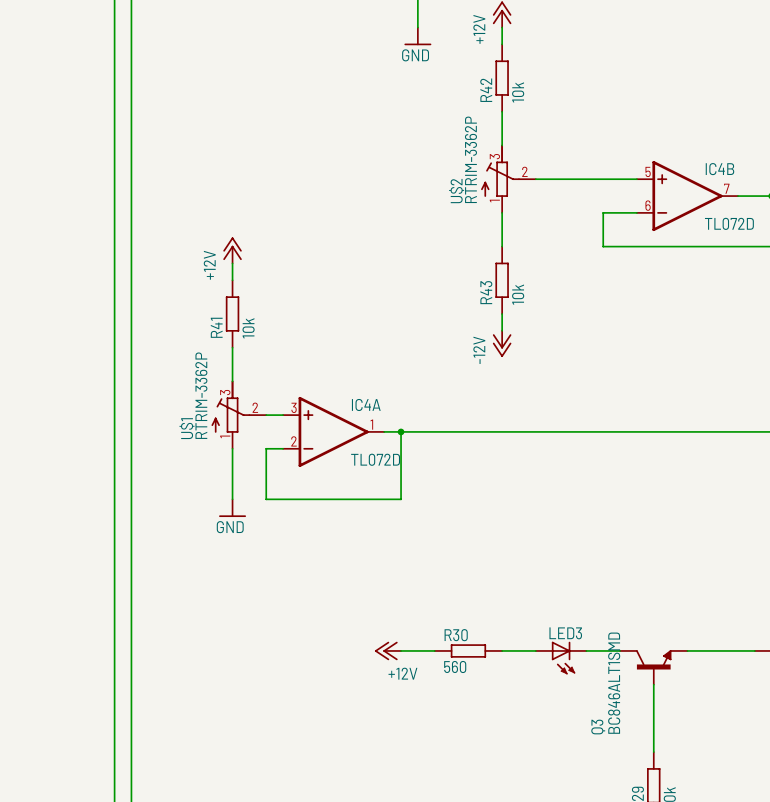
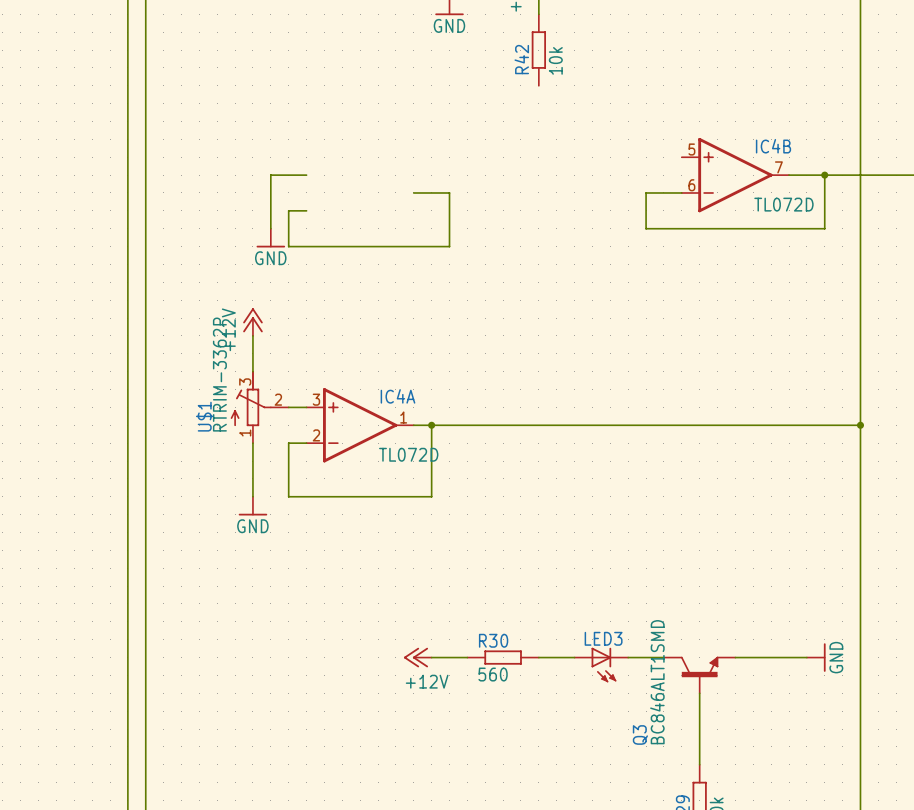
wire: (502, 111) (502, 145) -> none
U$2: RTRIM-3362P (508, 178) -> none
wire: (535, 179) (636, 179) -> none
wire: none -> (306, 175) (270, 175) (270, 228)
wire: none -> (413, 192) (449, 192) (449, 246) (288, 246) (288, 210) (306, 210)
wire: (502, 212) (502, 246) -> none
power symbol position: +12V (232, 250) -> +12V (252, 322)
power symbol: none -> GND (270, 238)
wire: (232, 263) (232, 280) -> none
R43: 10k (502, 280) -> none
R41: 10k (232, 313) -> none
wire: (502, 313) (502, 330) -> none
power symbol: -12V (502, 343) -> none

